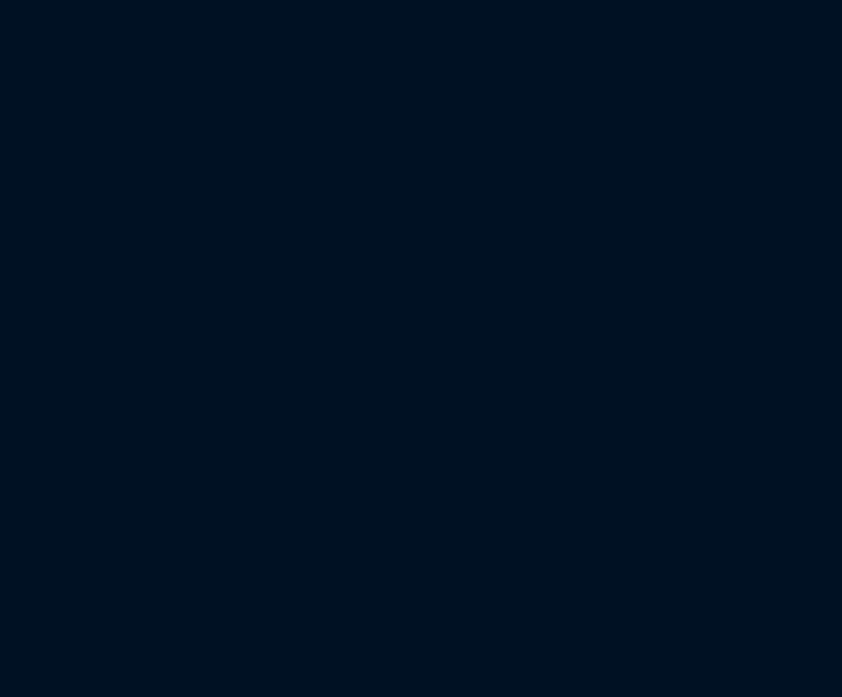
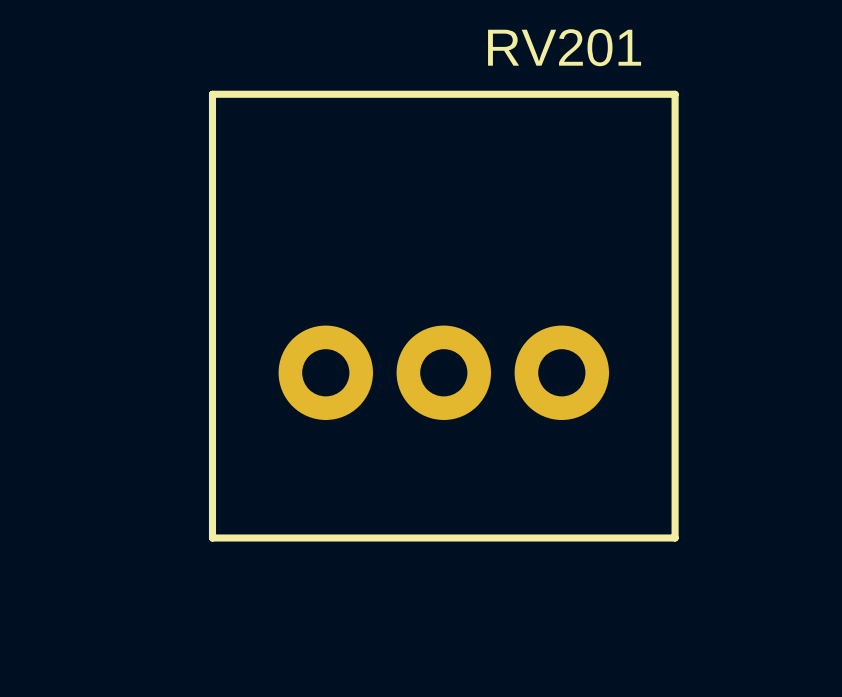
RV201: none -> (443, 316)

